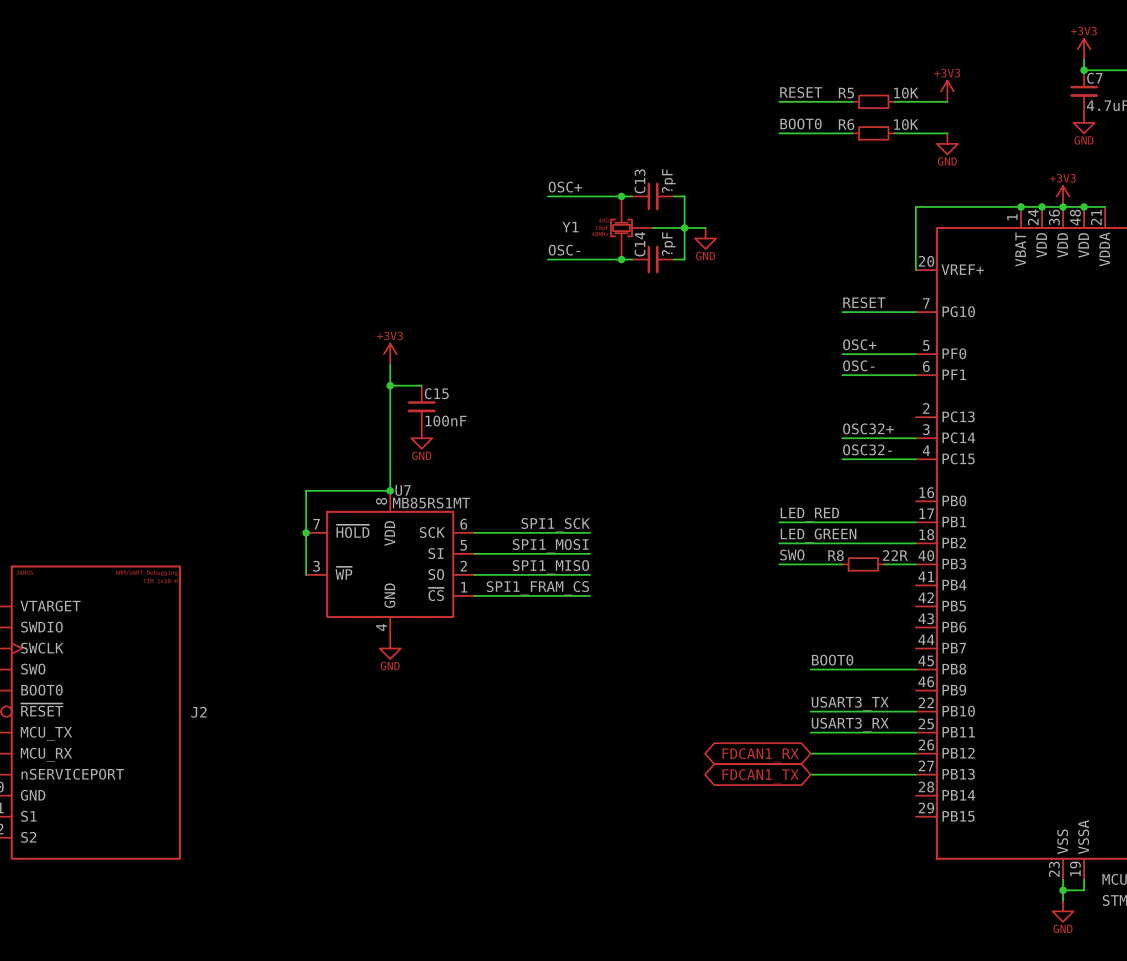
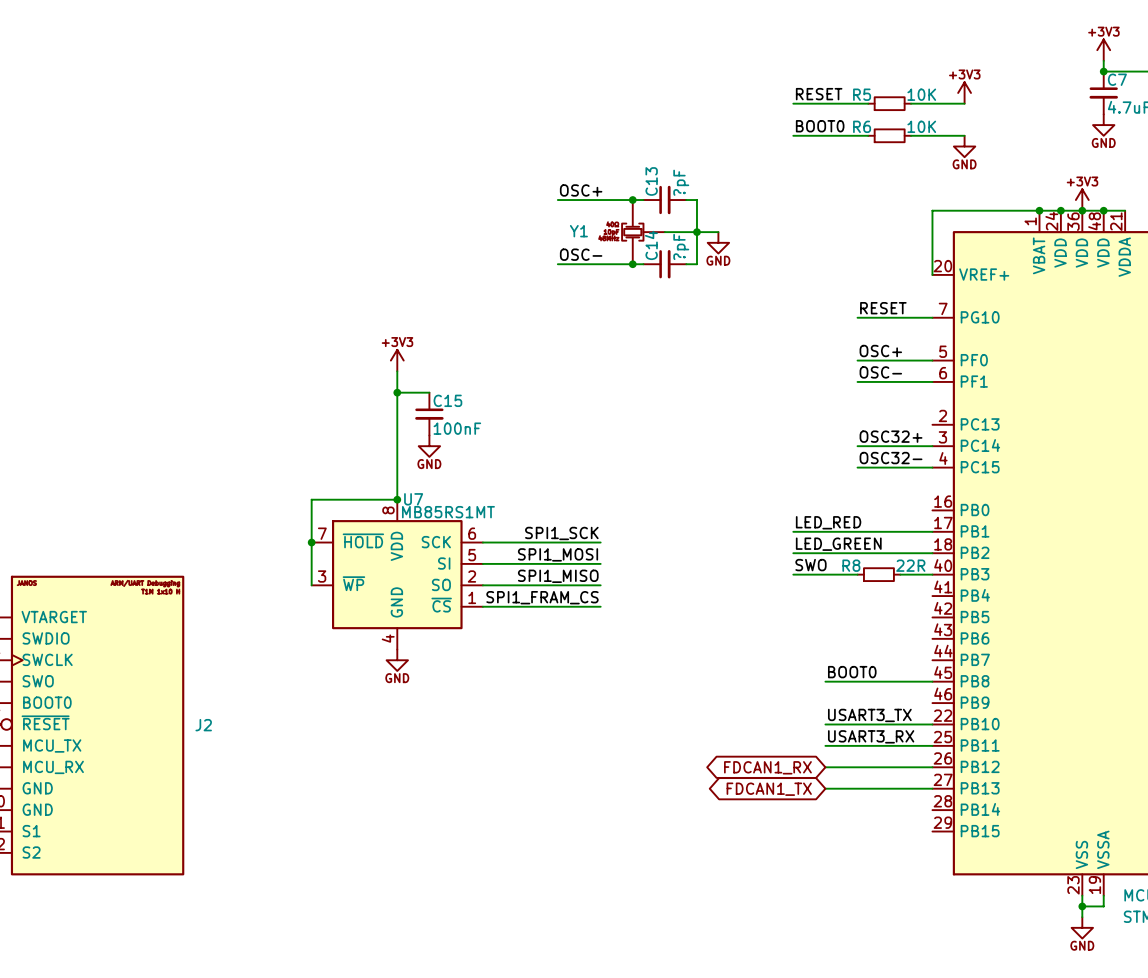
J2 pin name: nSERVICEPORT (72, 774) -> GND (37, 788)

